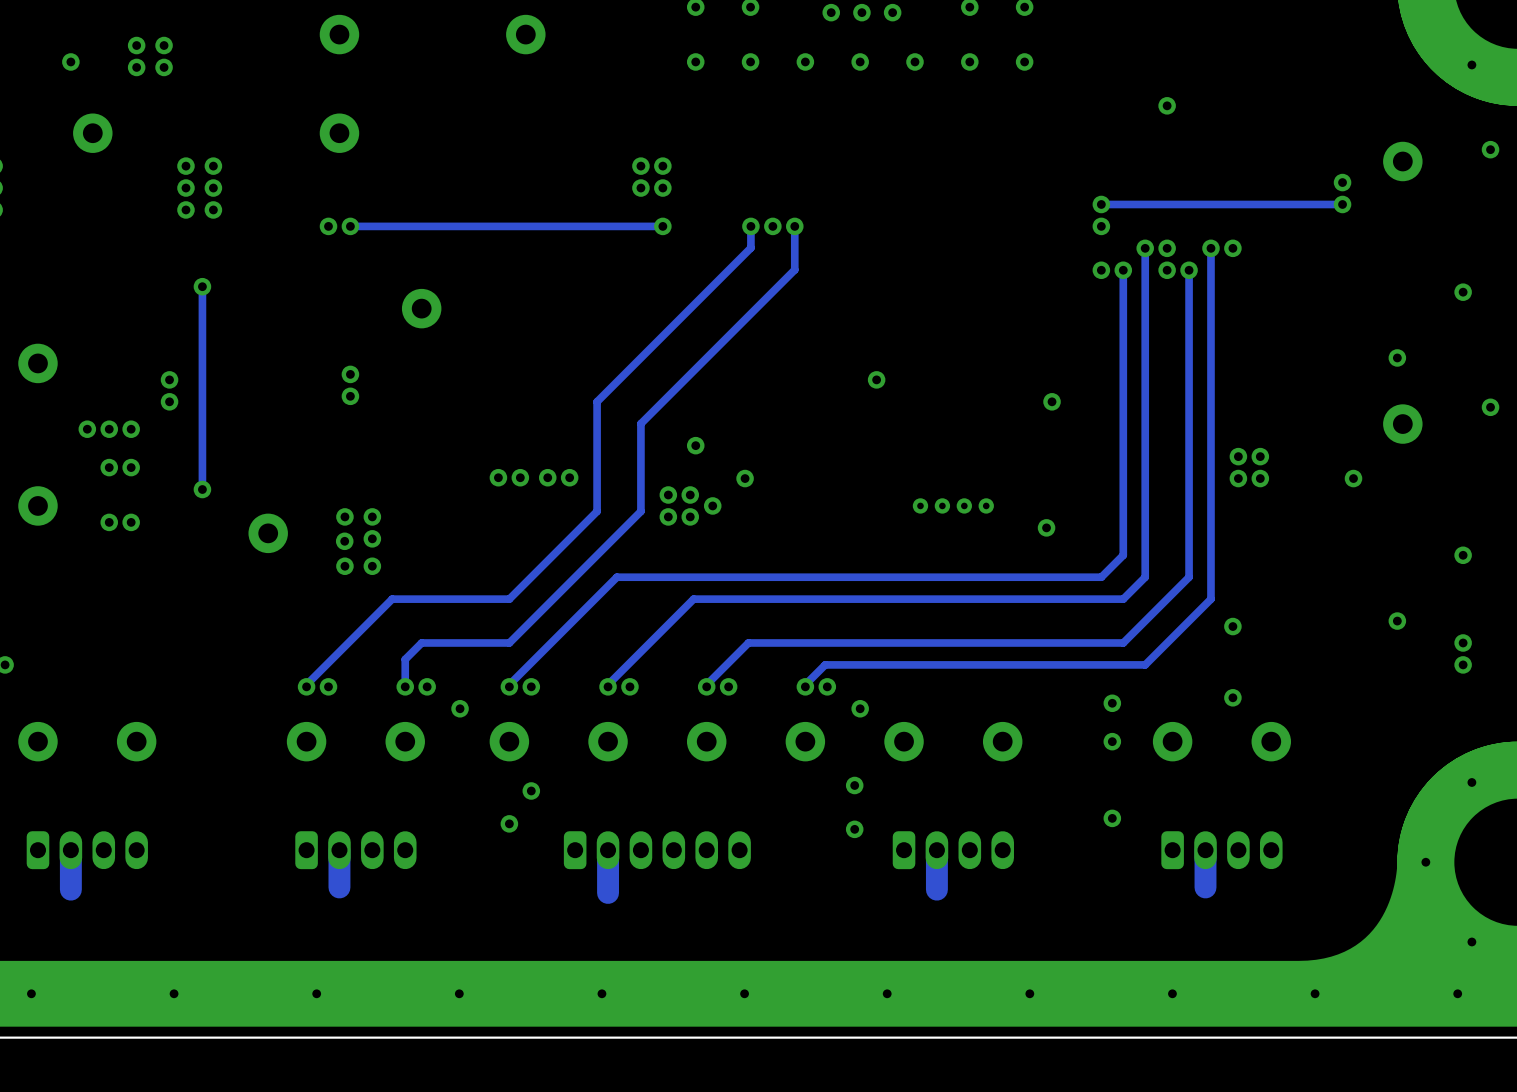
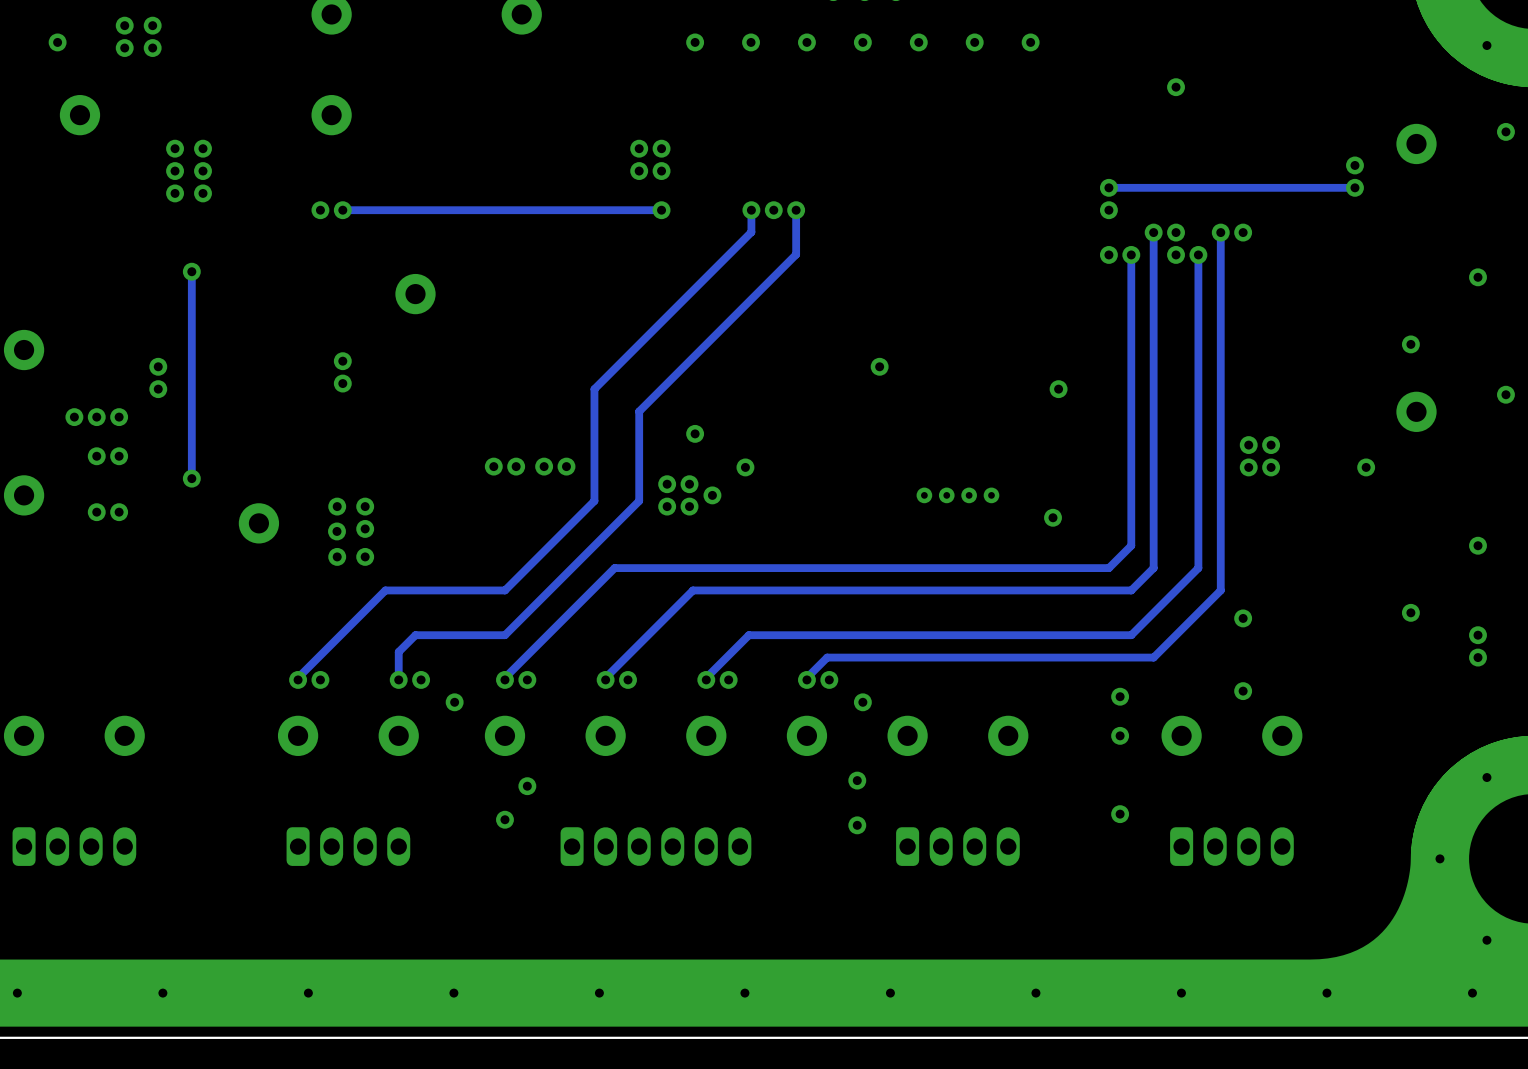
track: (70, 850) (70, 889) -> none
track: (339, 850) (339, 887) -> none
track: (608, 850) (608, 892) -> none
track: (936, 850) (936, 889) -> none
track: (1205, 850) (1205, 887) -> none

